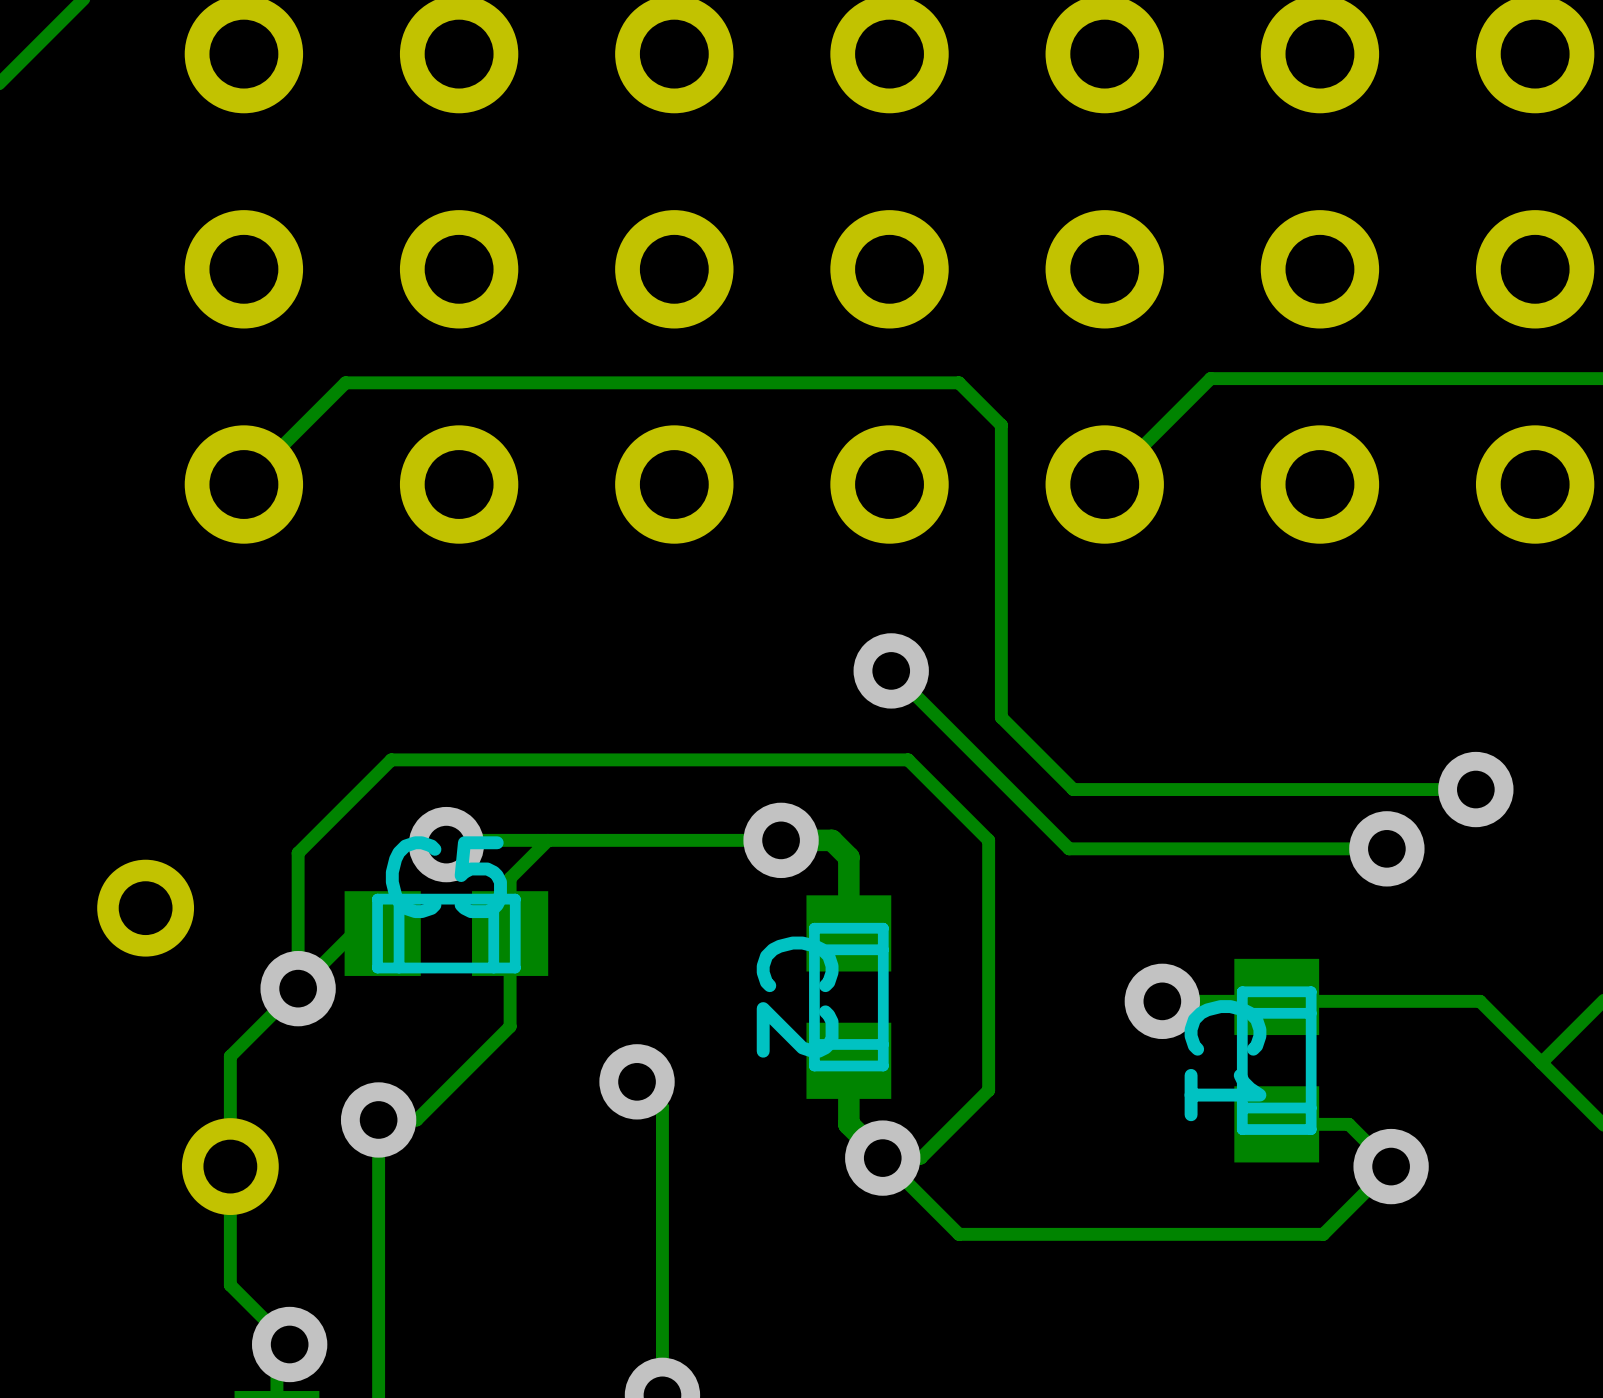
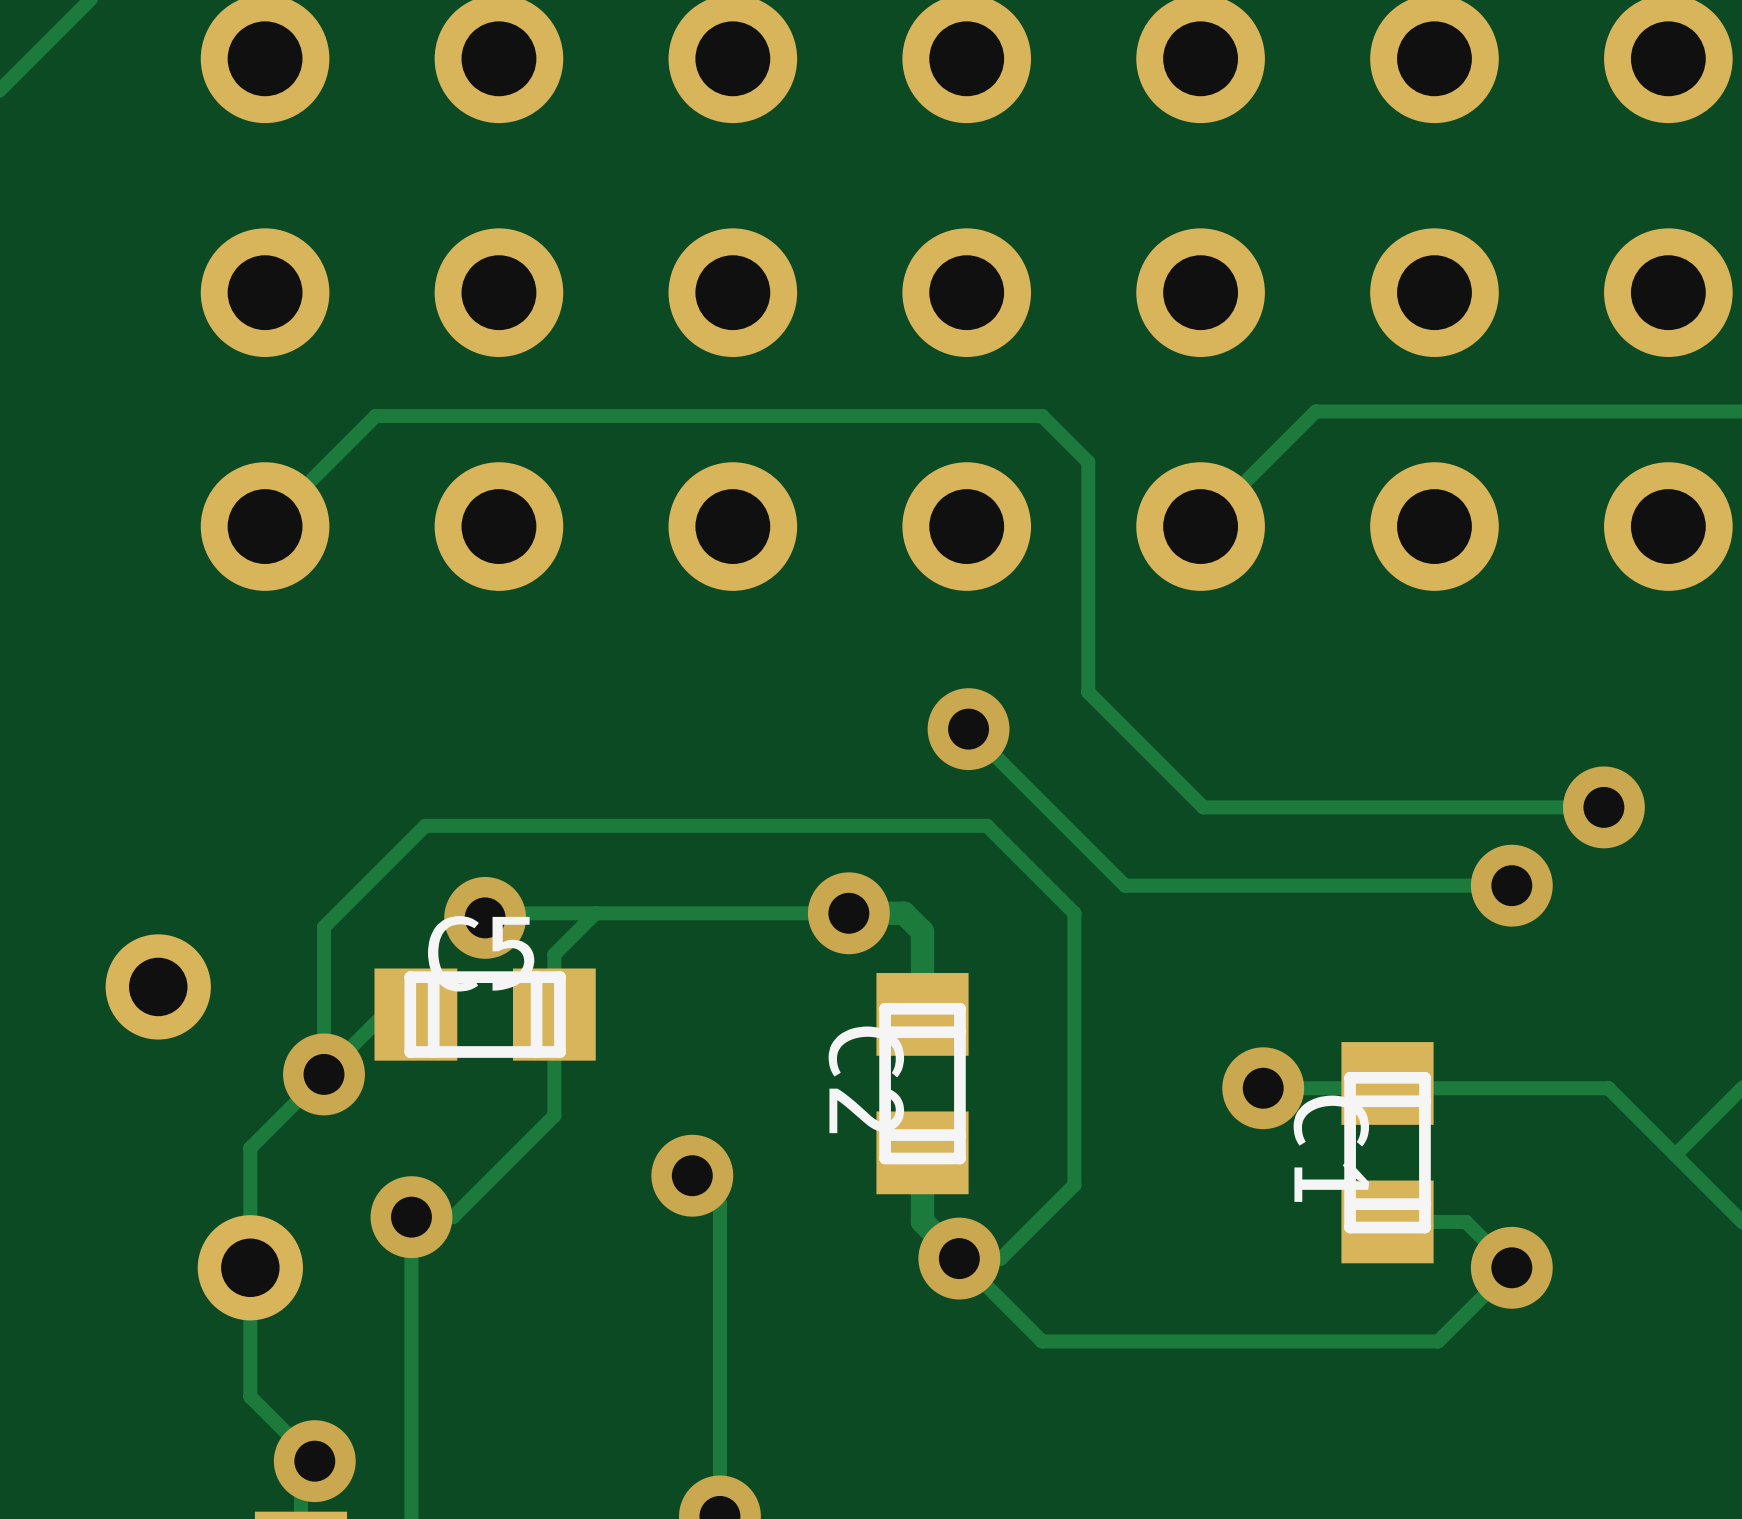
track: (1001, 637) (1001, 717) (1073, 789) (1475, 789) -> (1088, 692) (1203, 807) (1603, 807)
via position: (1475, 789) -> (1603, 807)
track: (1035, 814) (1069, 848) (1386, 848) -> (1125, 885) (1511, 885)
via position: (1386, 848) -> (1511, 885)

